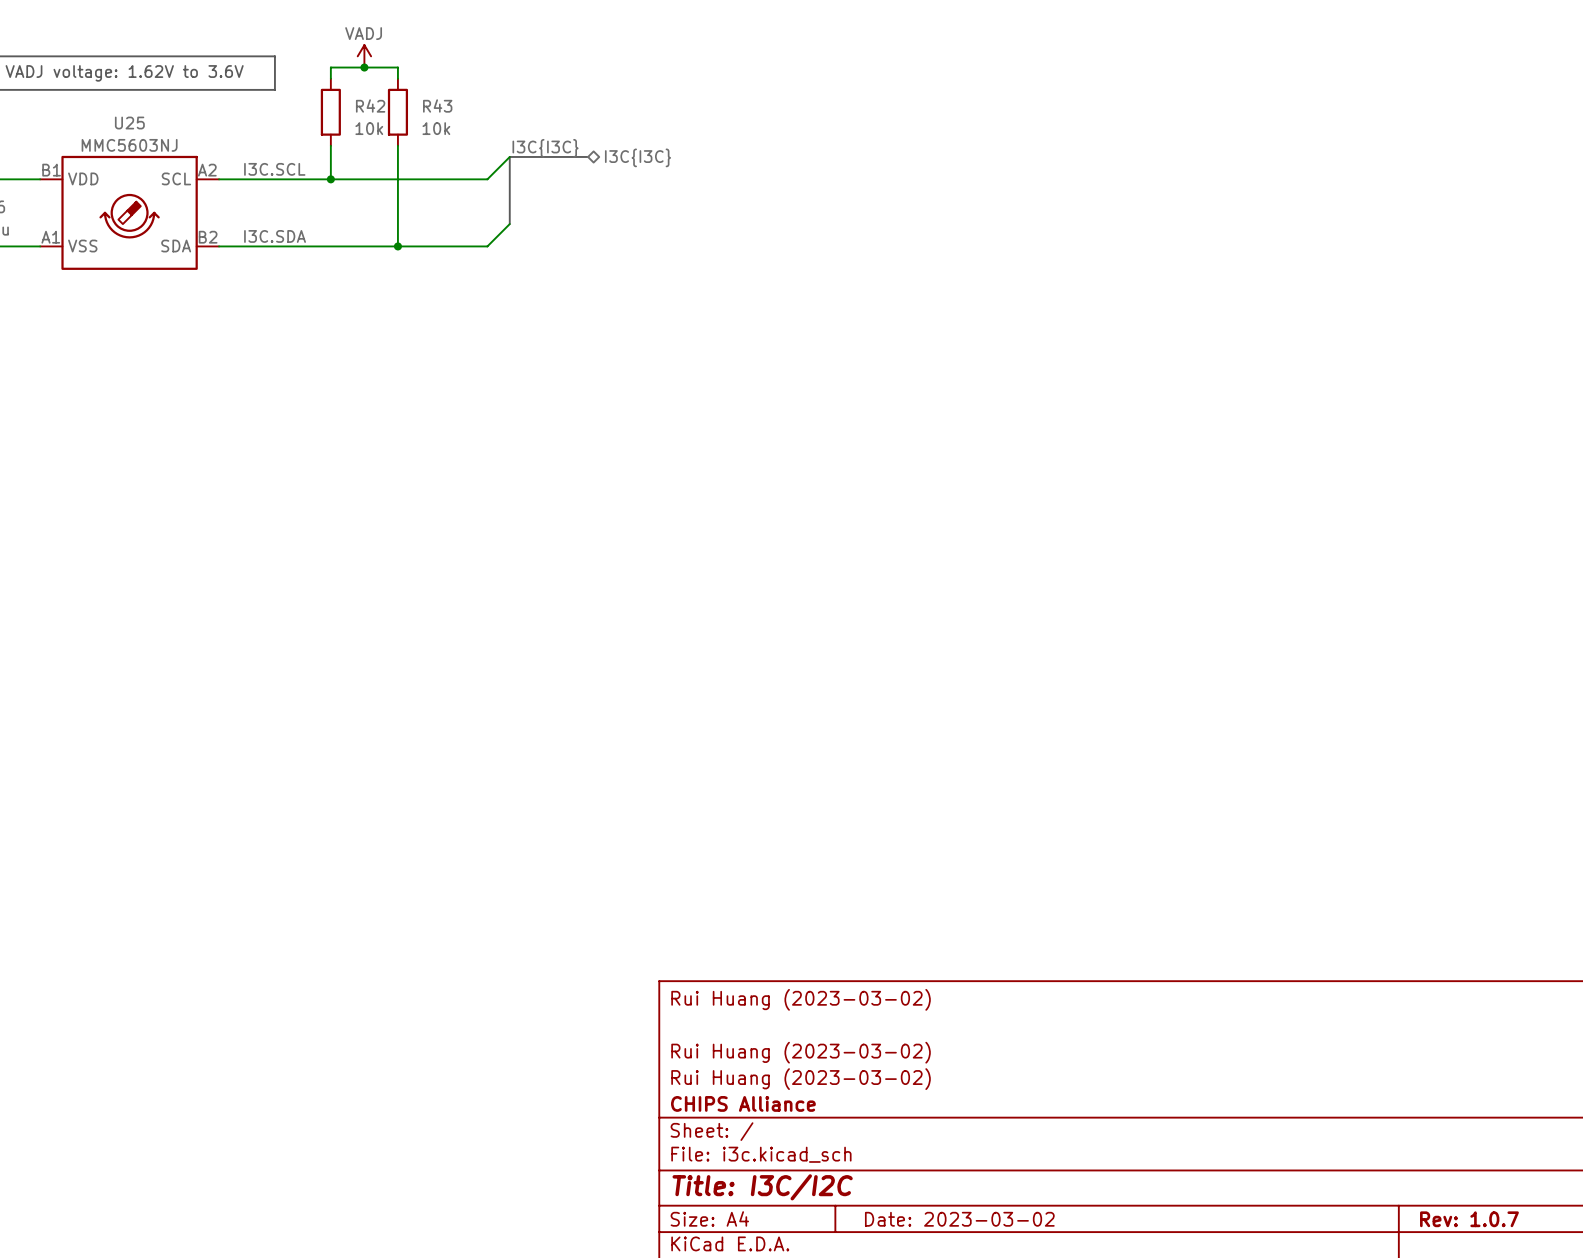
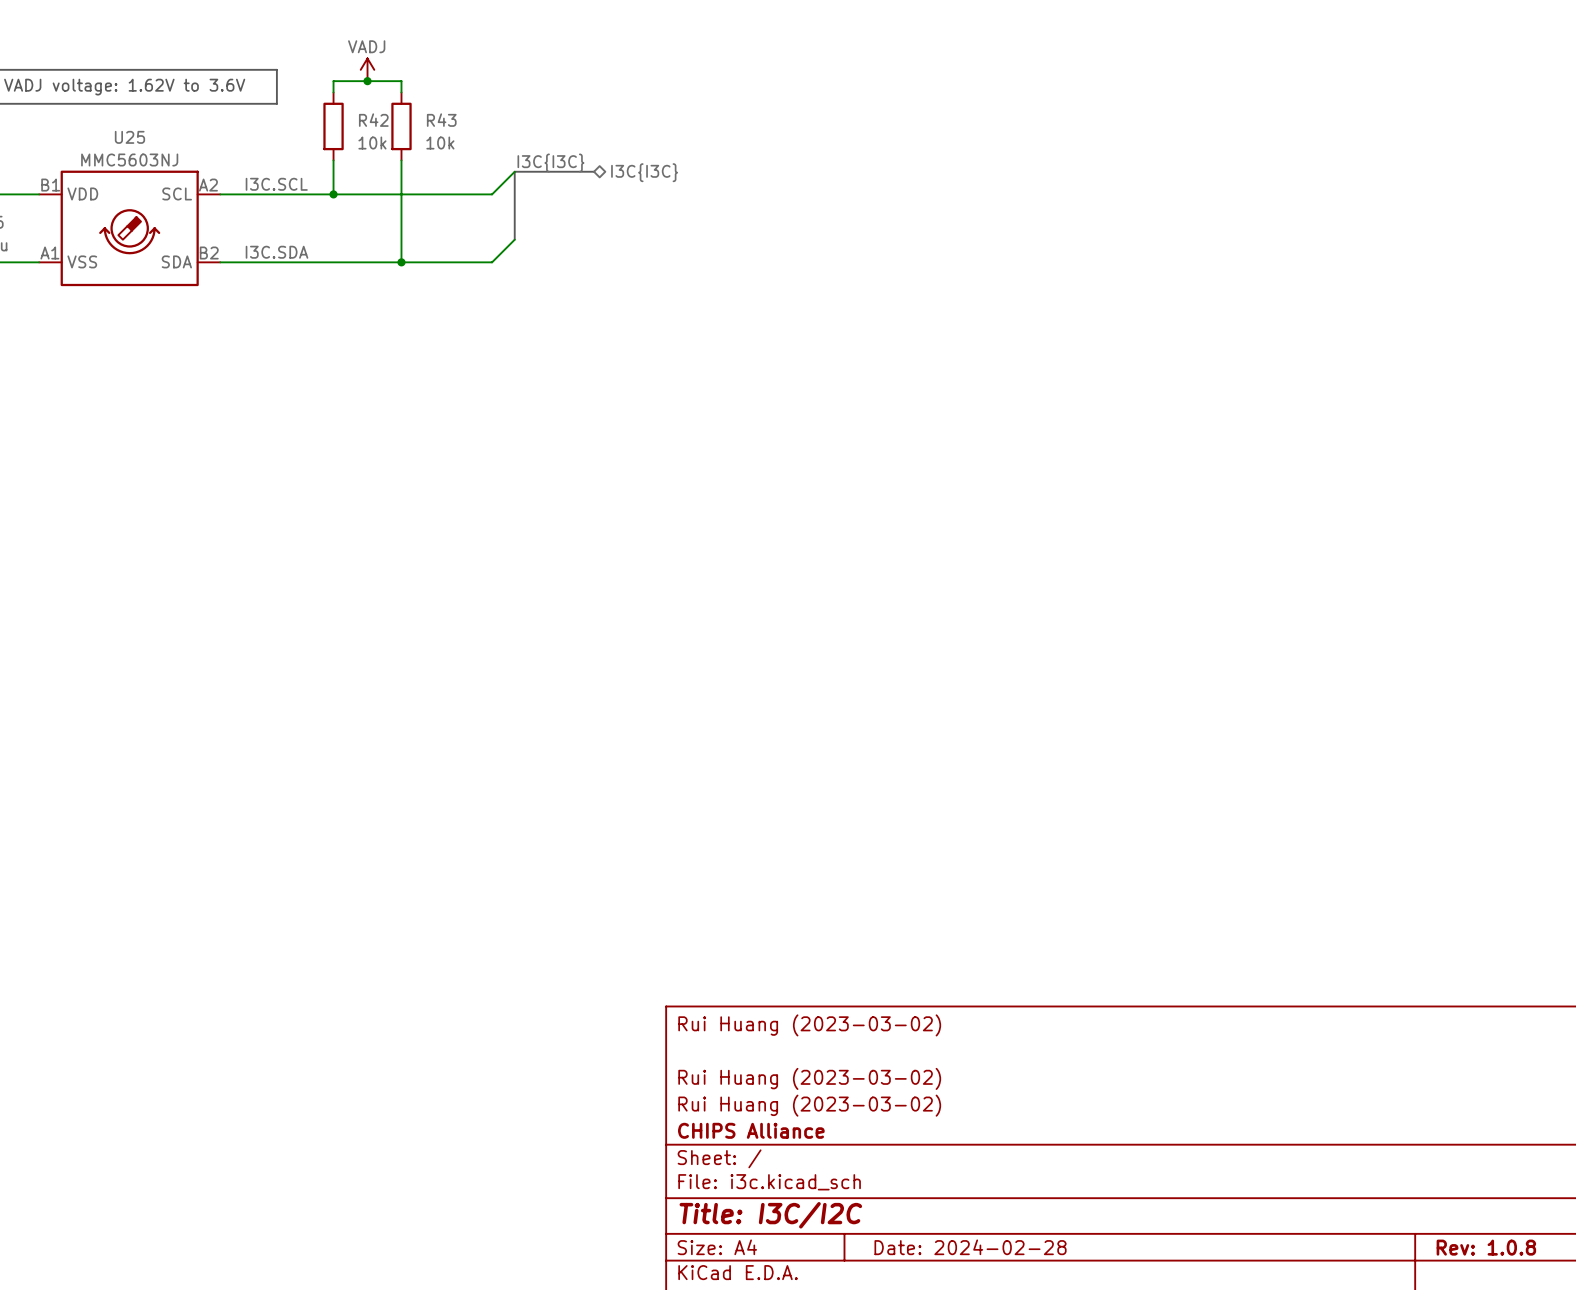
title block: Date: 2023-03-02 (959, 1219) -> Date: 2024-02-28 (970, 1247)
title block: Rev: 1.0.7 (1469, 1219) -> Rev: 1.0.8 (1486, 1247)

